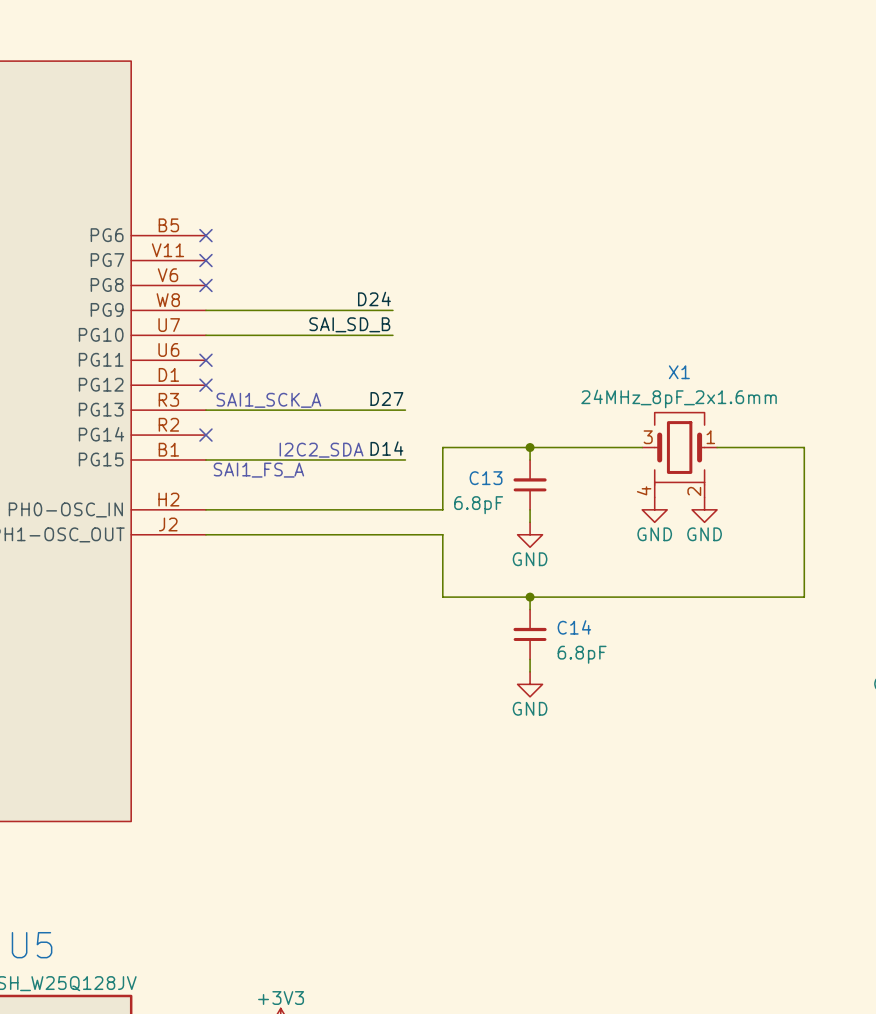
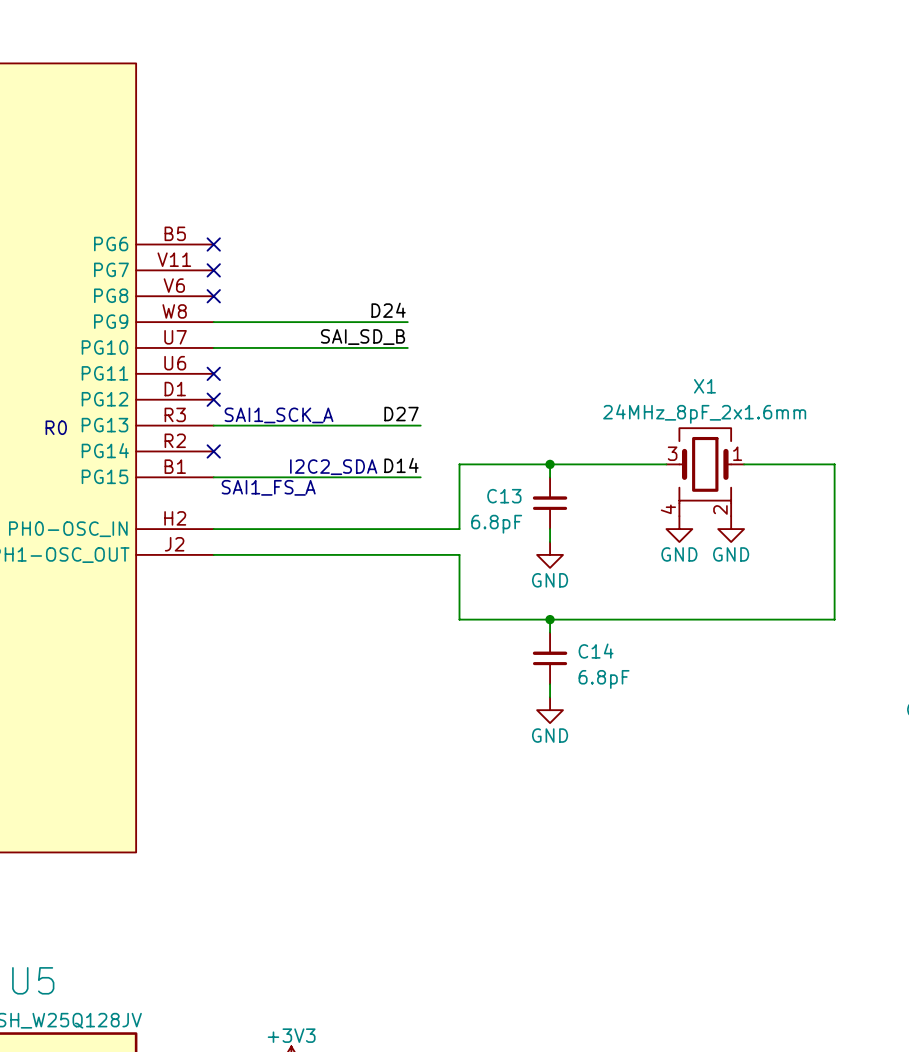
text: none -> R0 (56, 427)

